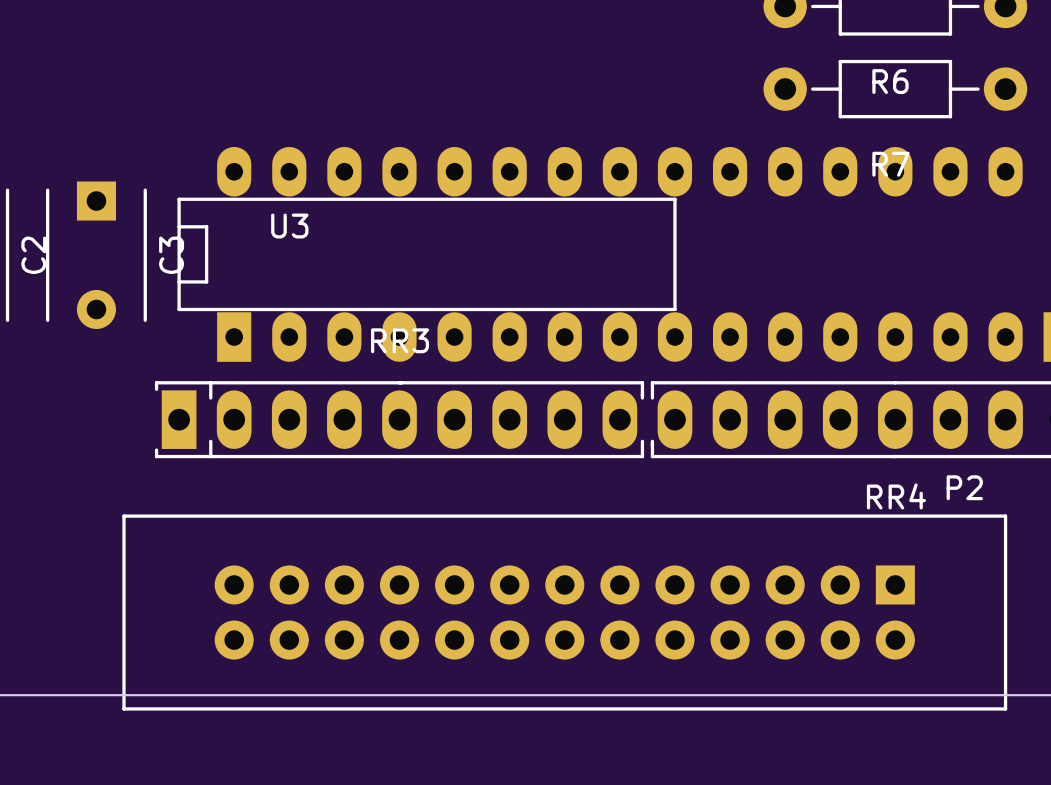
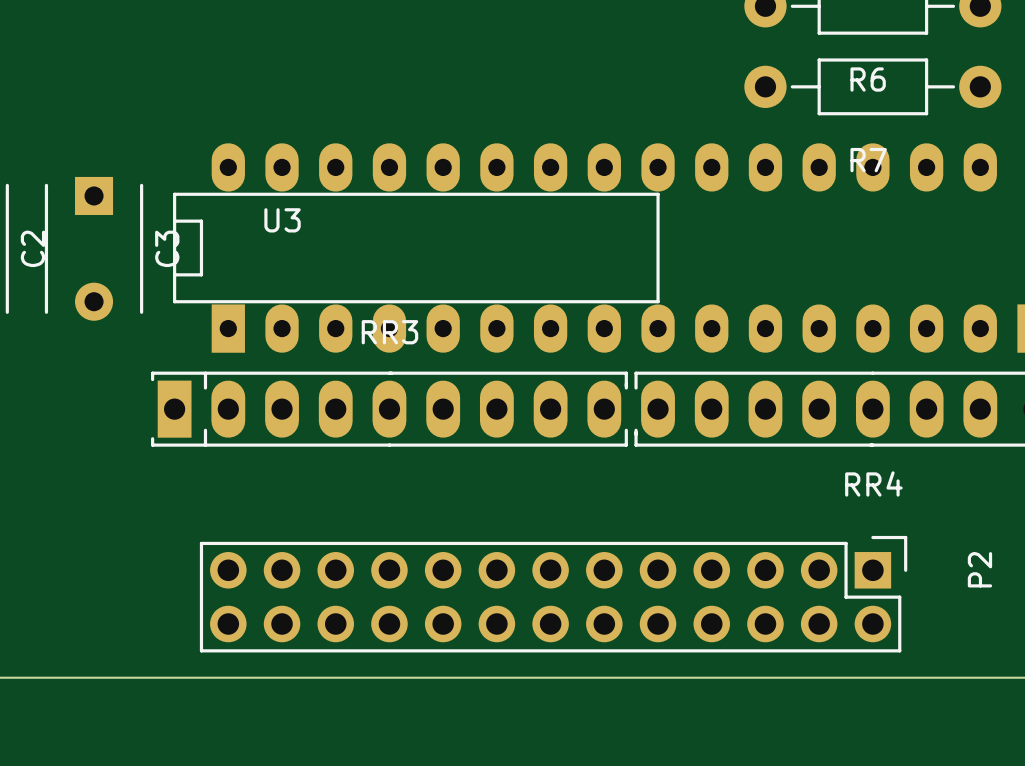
P2 name position: P2 (964, 487) -> P2 (979, 569)
P2 footprint: [122, 514, 1008, 711] -> [199, 535, 908, 653]

